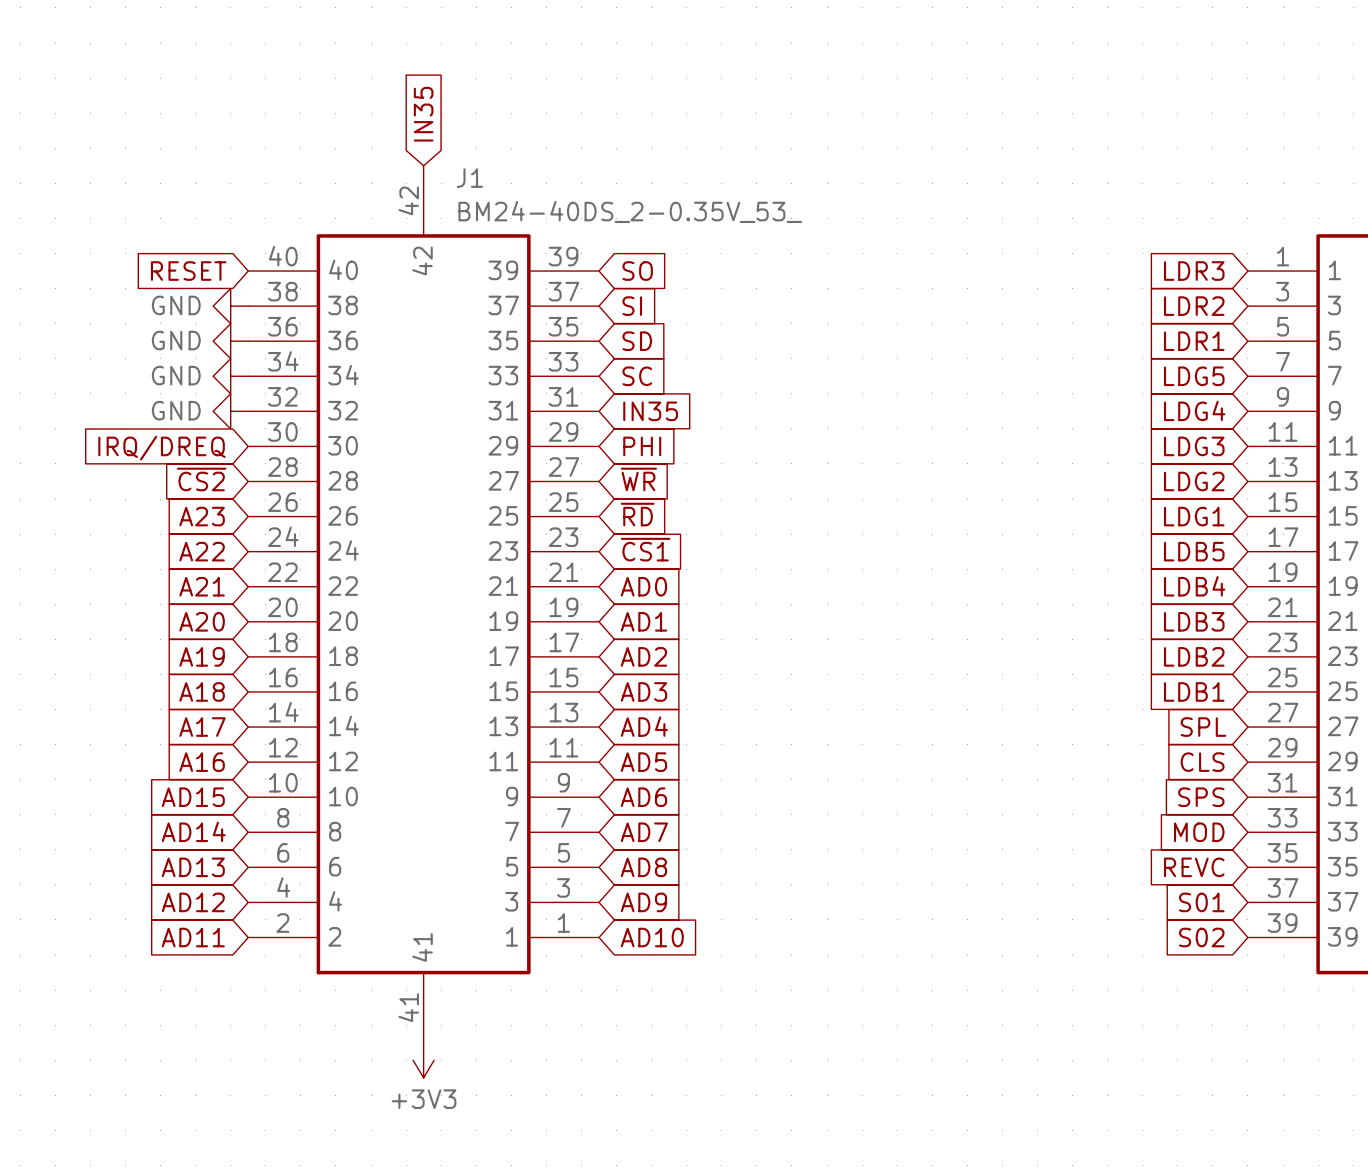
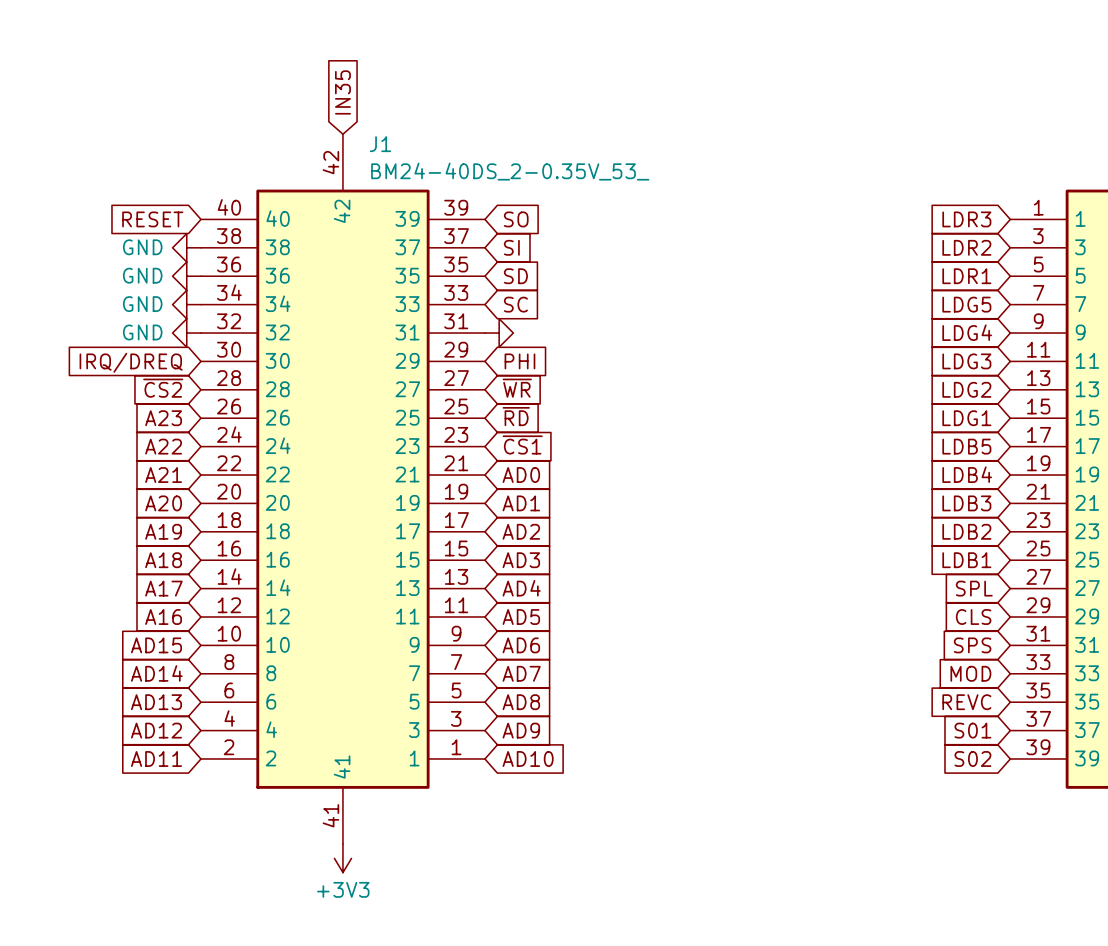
power symbol: none -> (499, 333)
global label: IN35 (650, 411) -> none

